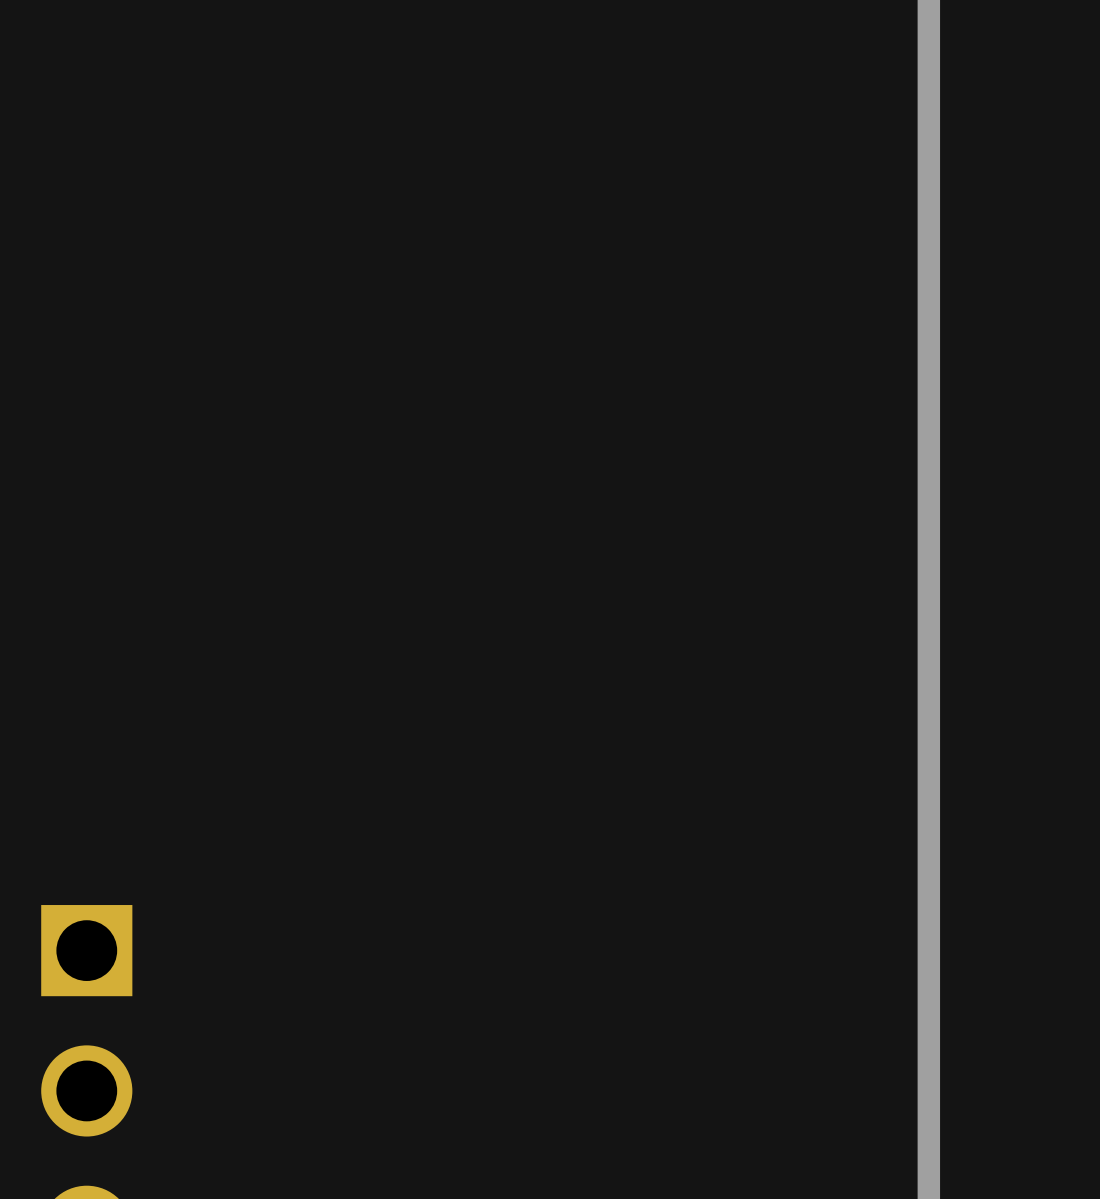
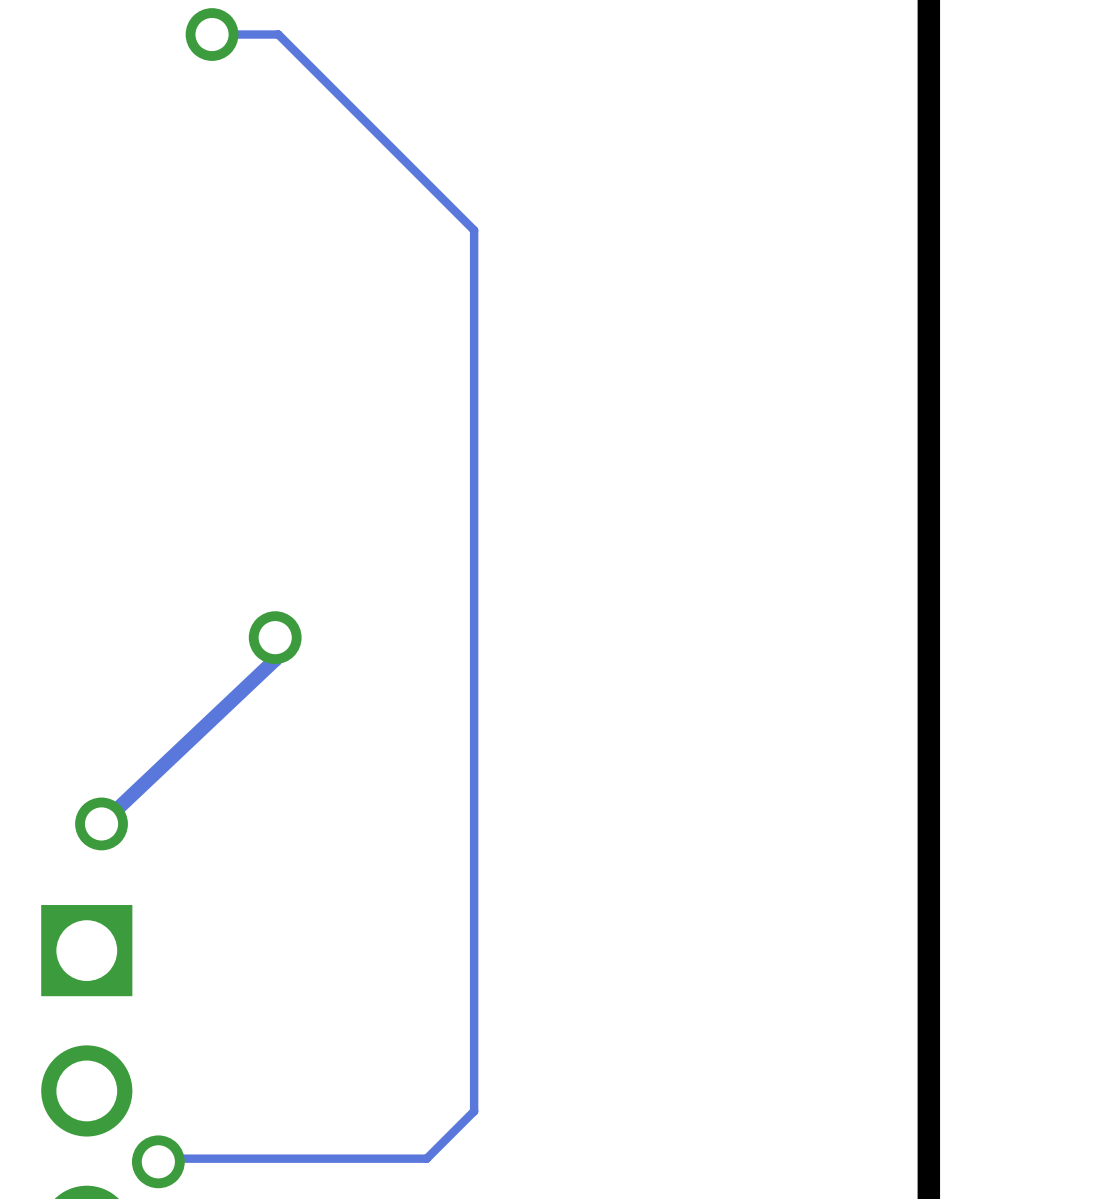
track: none -> (212, 34) (278, 34) (474, 230) (474, 1111) (426, 1158) (161, 1158) (158, 1161)
via: none -> (212, 34)
track: none -> (275, 637) (275, 659) (101, 823)
via: none -> (275, 637)
via: none -> (101, 823)
via: none -> (158, 1161)

